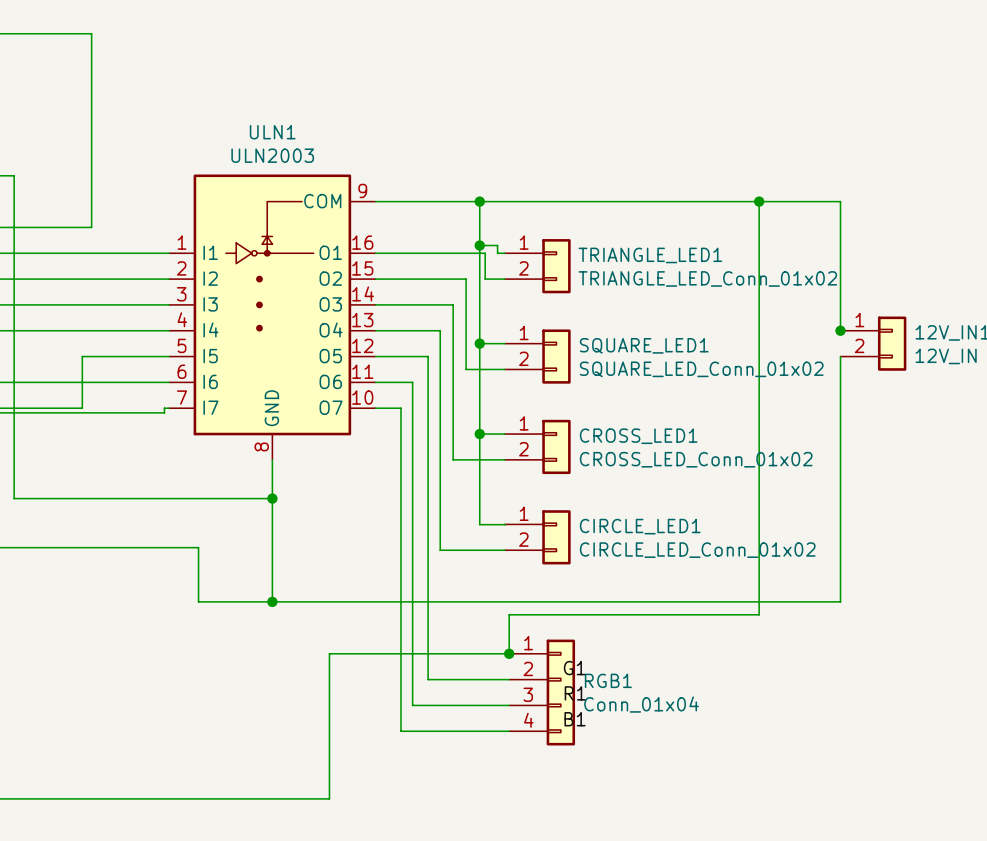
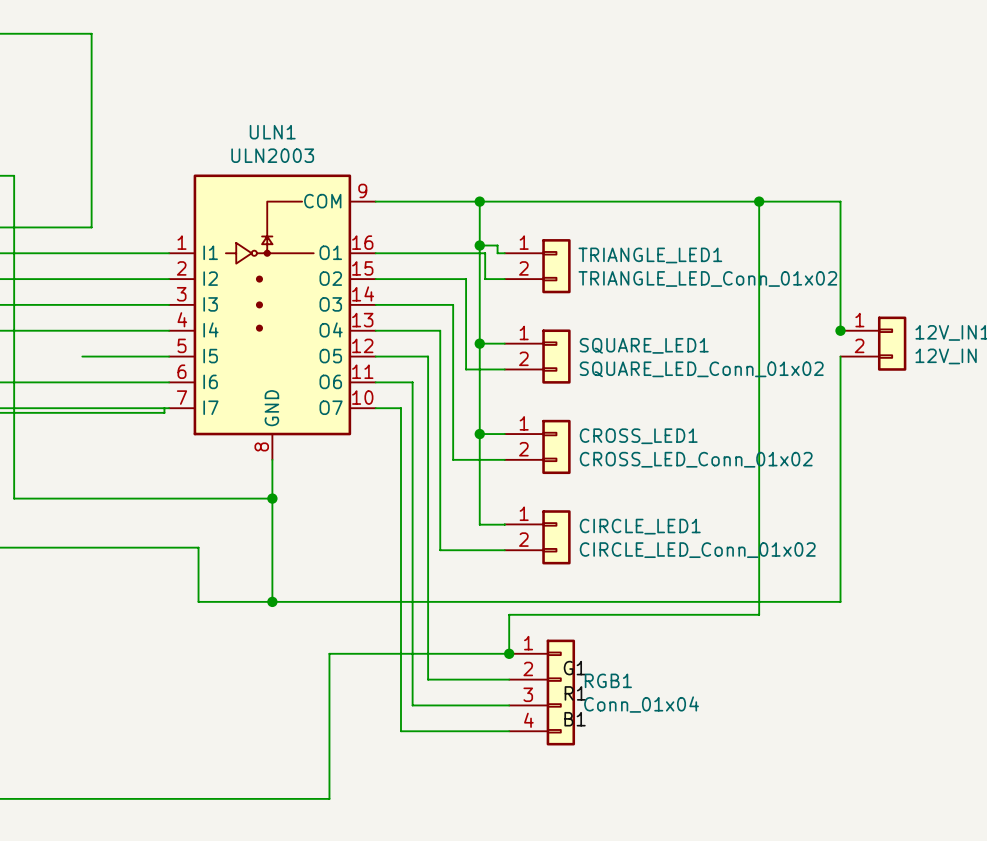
wire: (82, 356) (82, 408) -> (164, 408) (82, 408)

